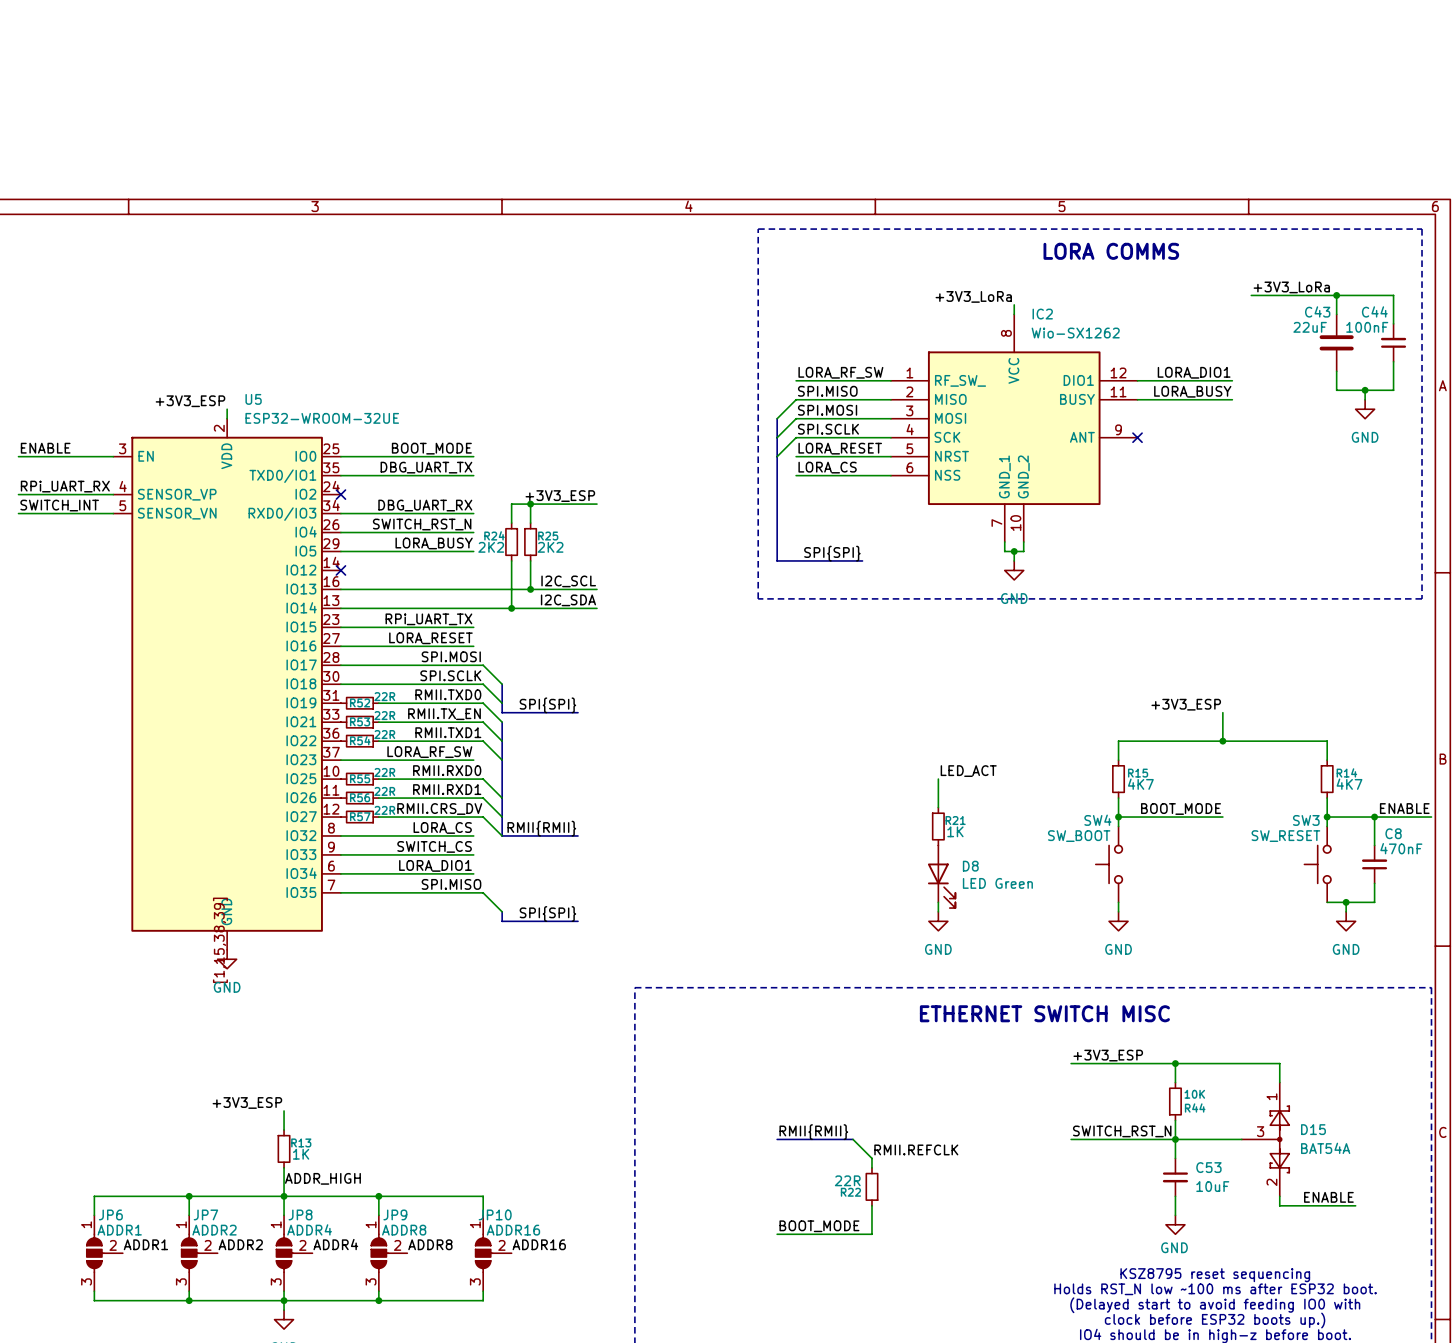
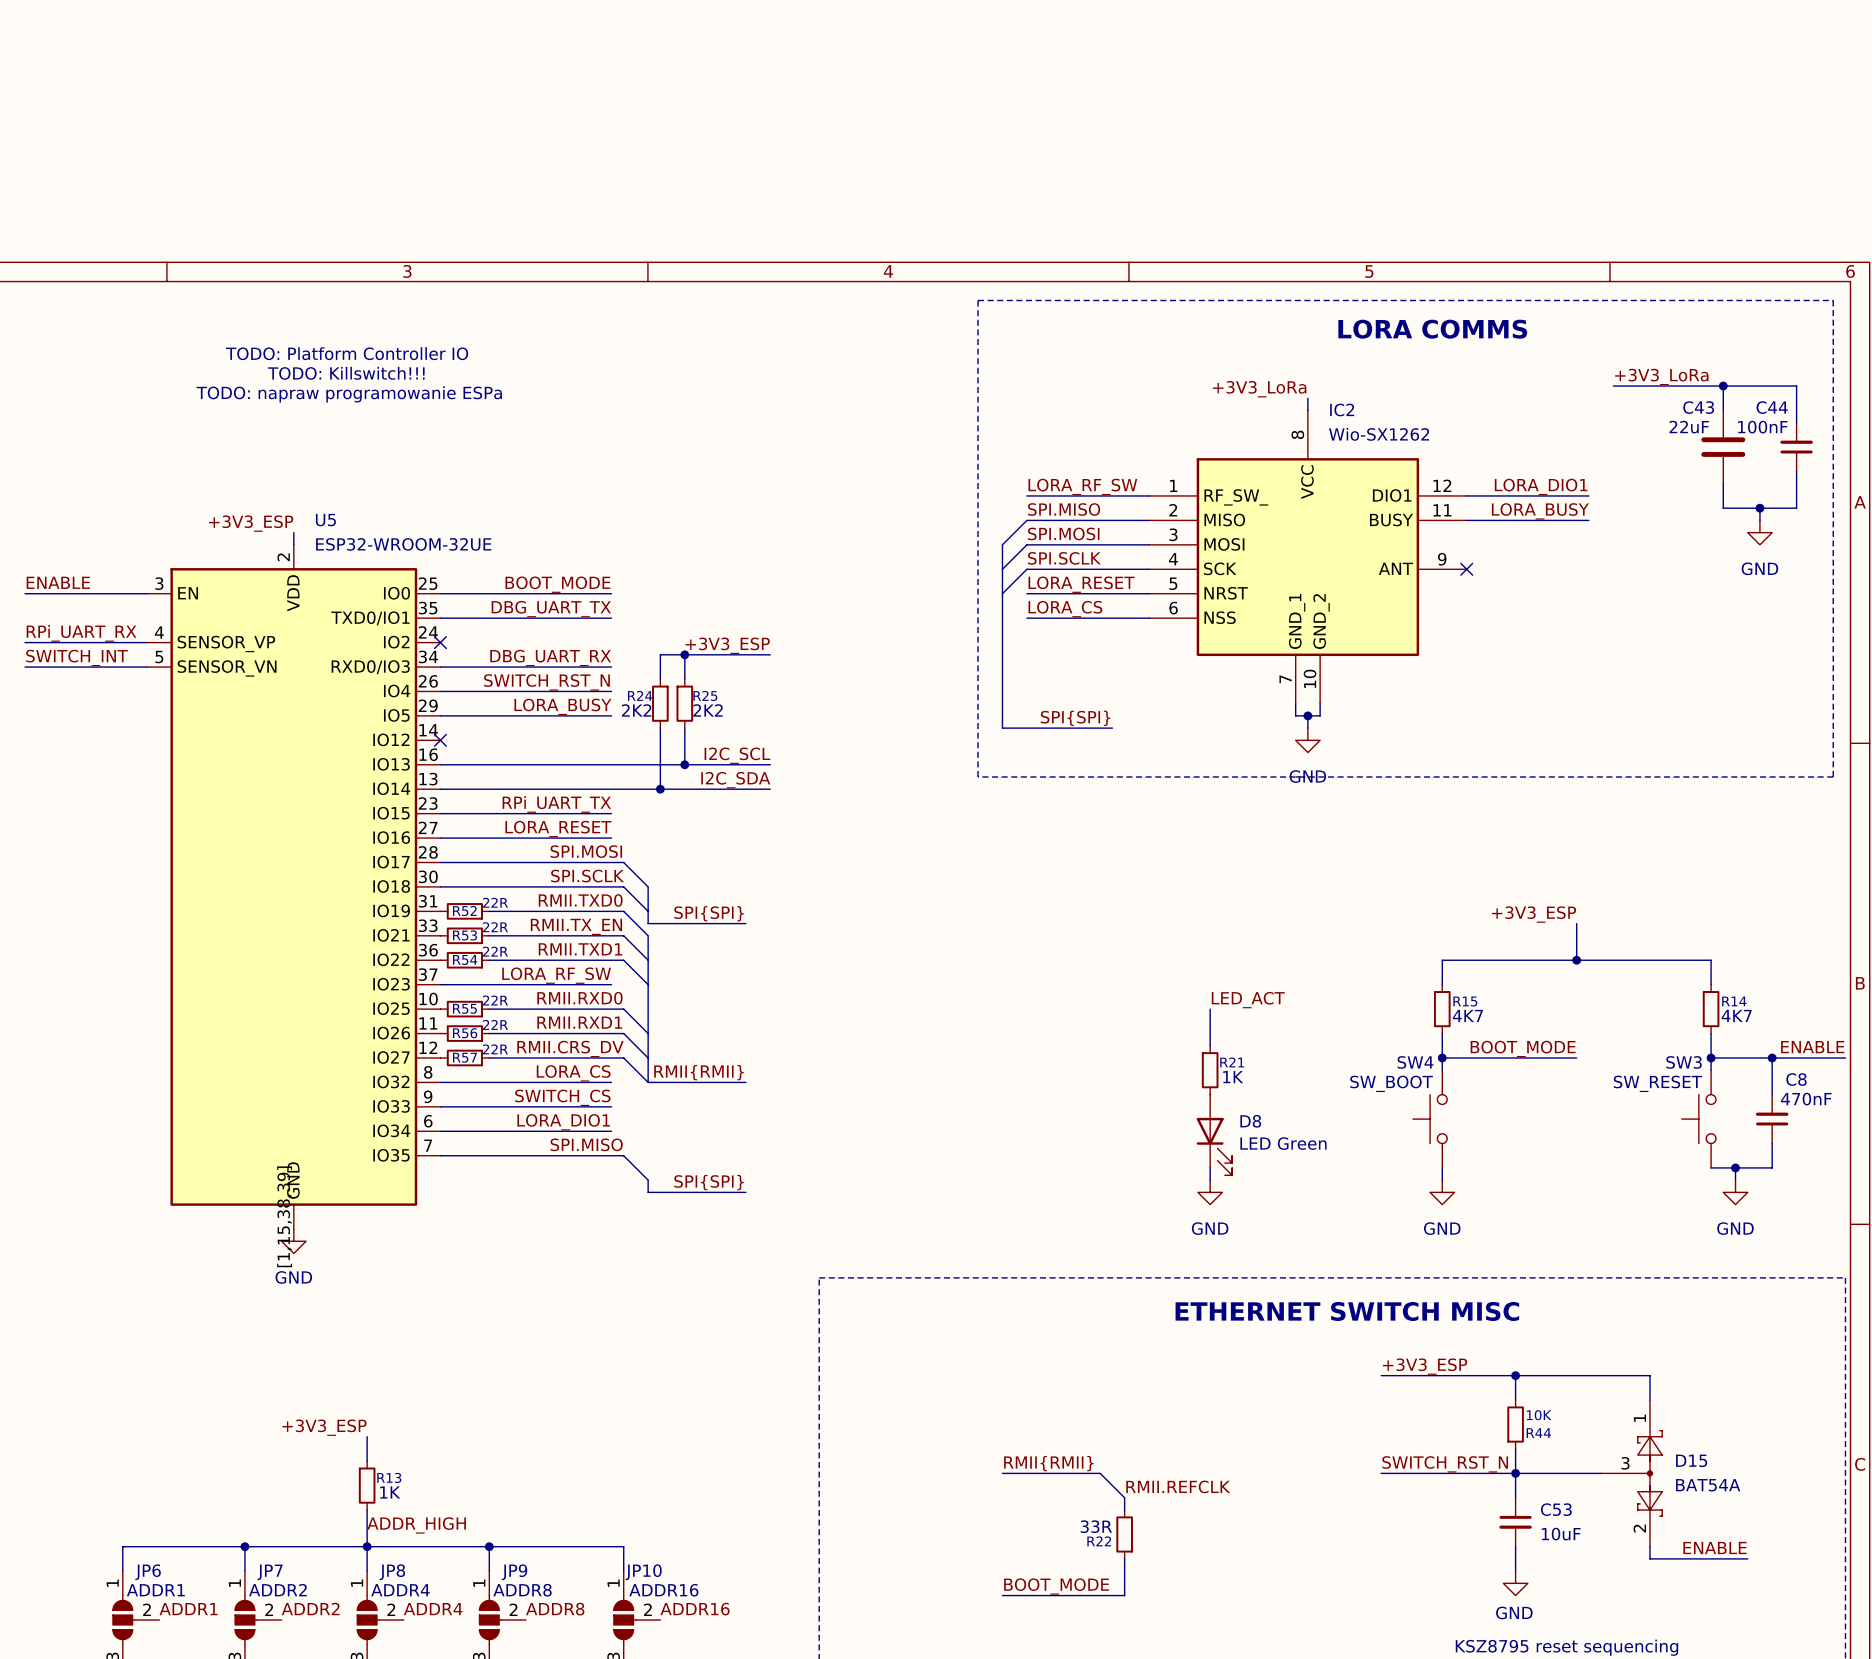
text: none -> TODO: Platform Controller IO (347, 353)
text: none -> TODO: Killswitch!!! (346, 373)
text: none -> TODO: napraw programowanie ESPa (349, 394)
R22 value: 22R (847, 1180) -> 33R (1096, 1526)

